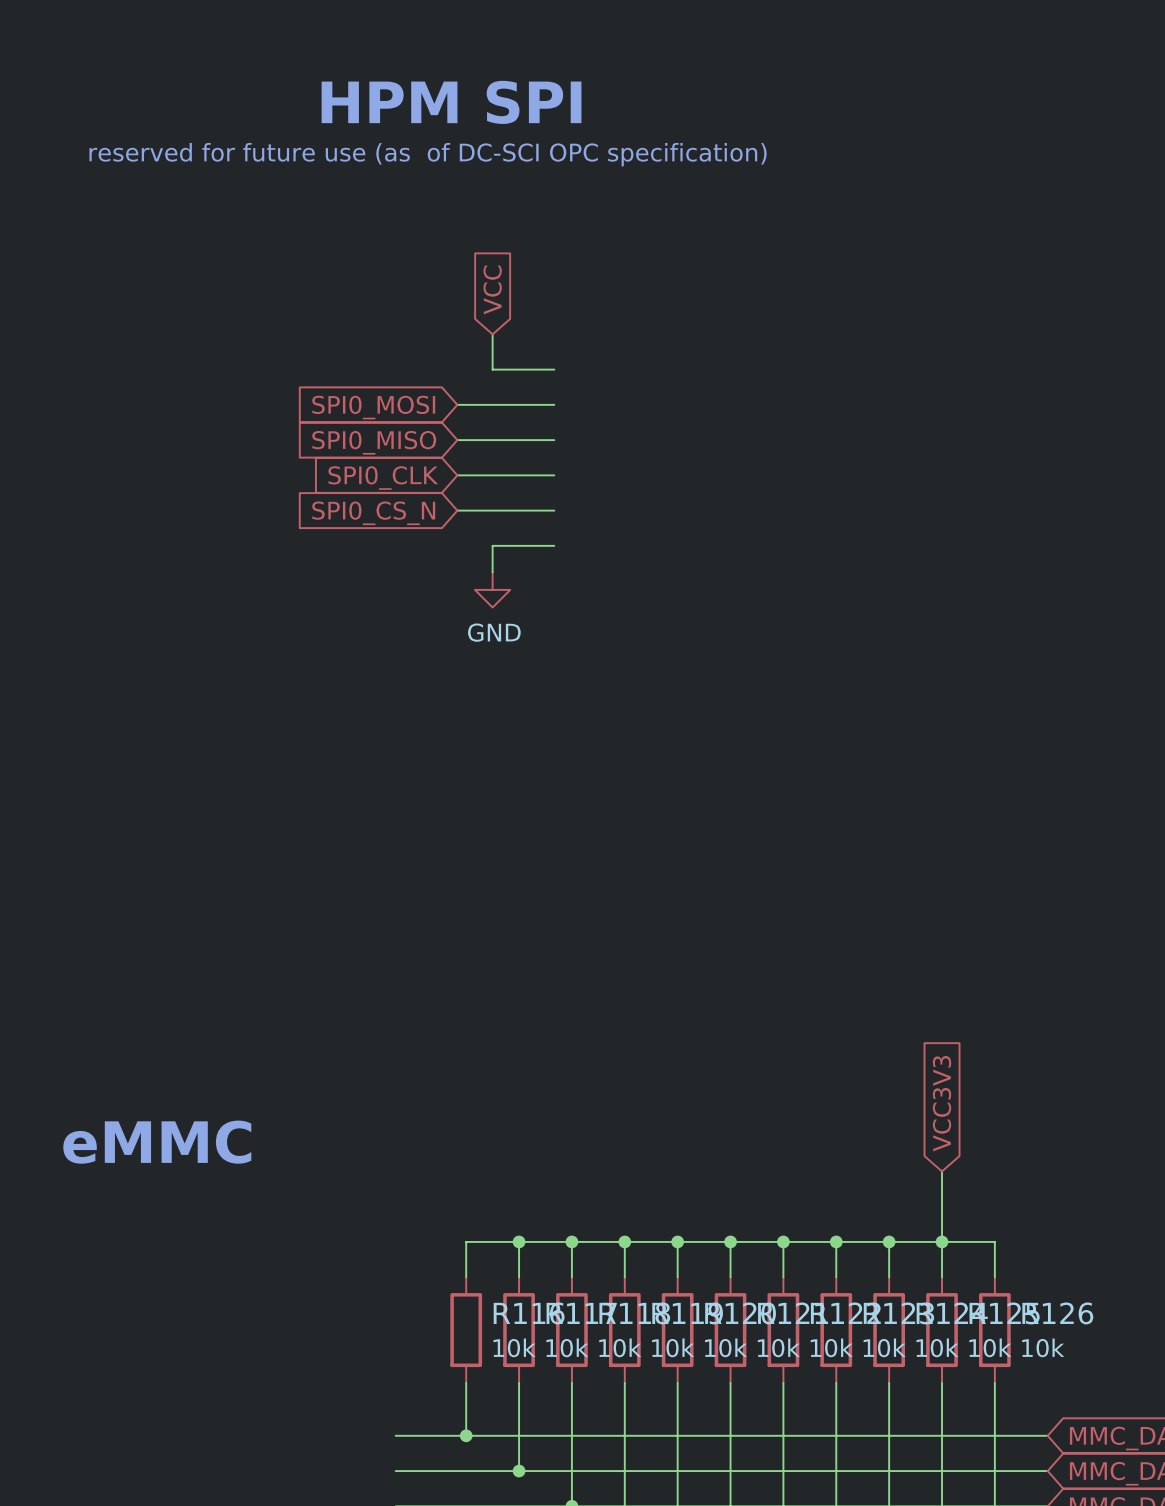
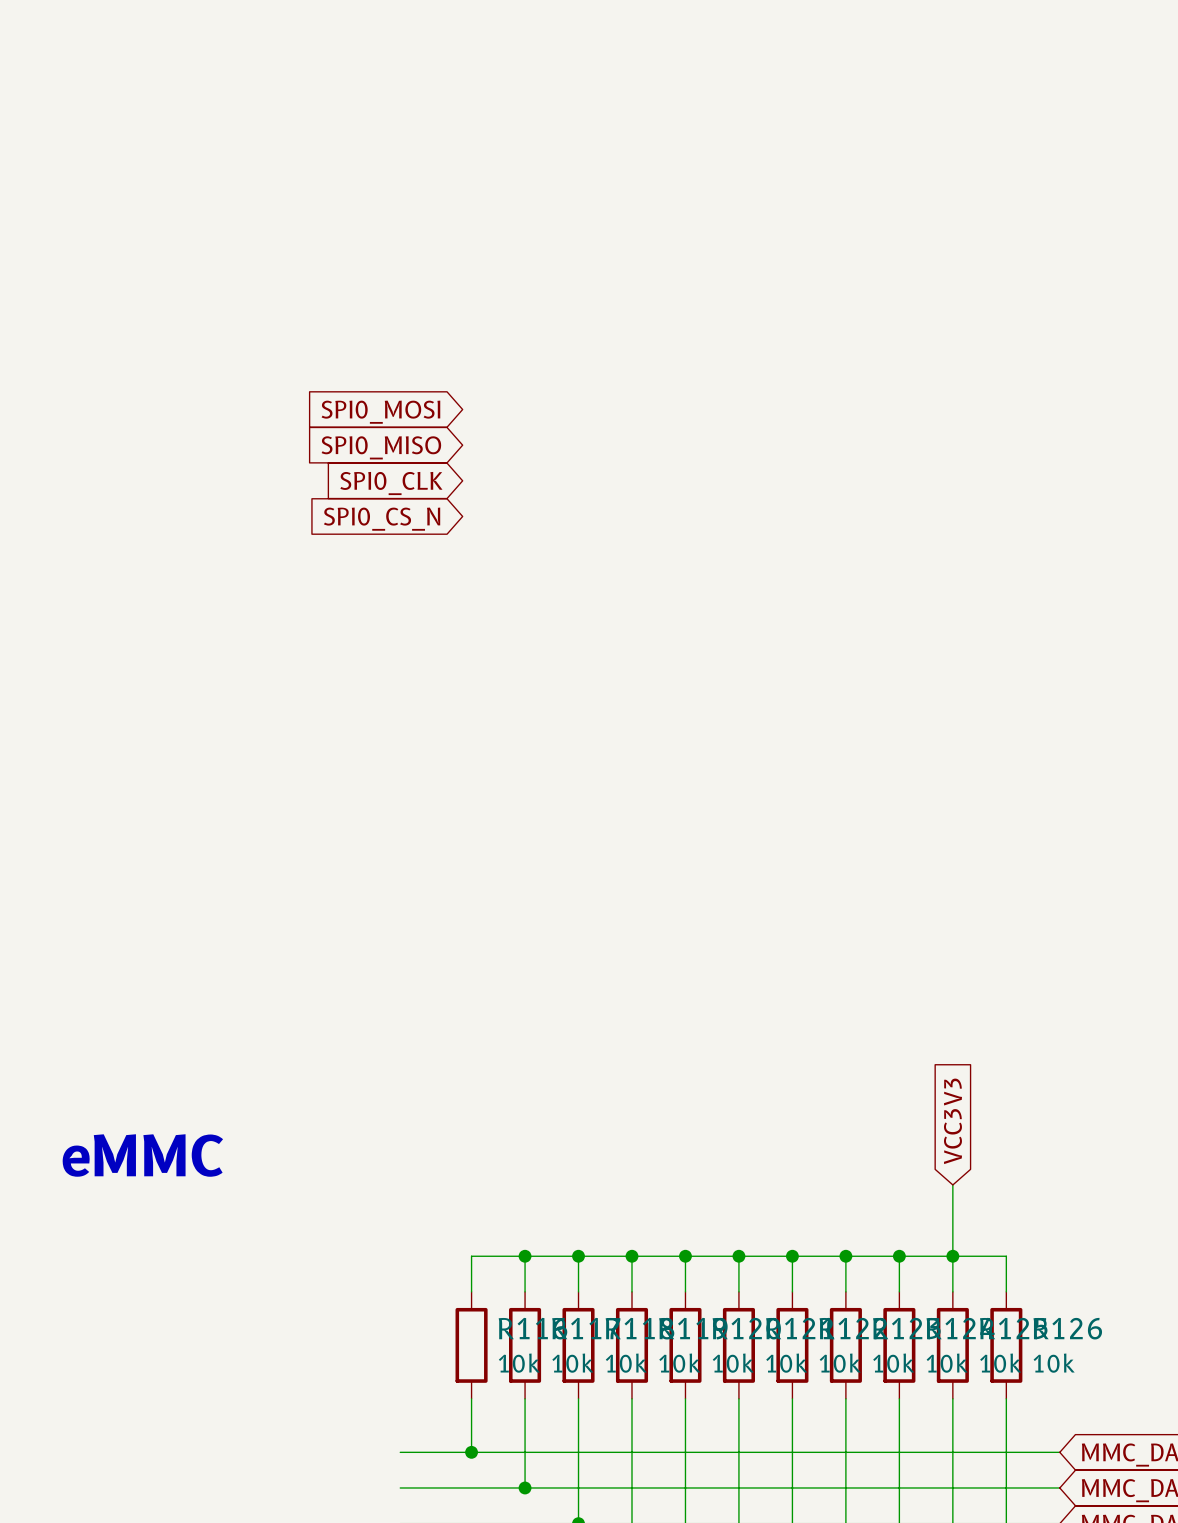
text: HPM SPI (451, 102) -> none
text: reserved for future use (as of DC-SCI OPC specification) (428, 154) -> none
global label: VCC (492, 289) -> none
wire: (492, 334) (492, 369) (554, 369) -> none
wire: (457, 404) (554, 404) -> none
wire: (457, 440) (554, 440) -> none
wire: (457, 475) (554, 475) -> none
wire: (457, 510) (554, 510) -> none
wire: (554, 545) (492, 545) (492, 572) -> none
power symbol: GND (492, 589) -> none

